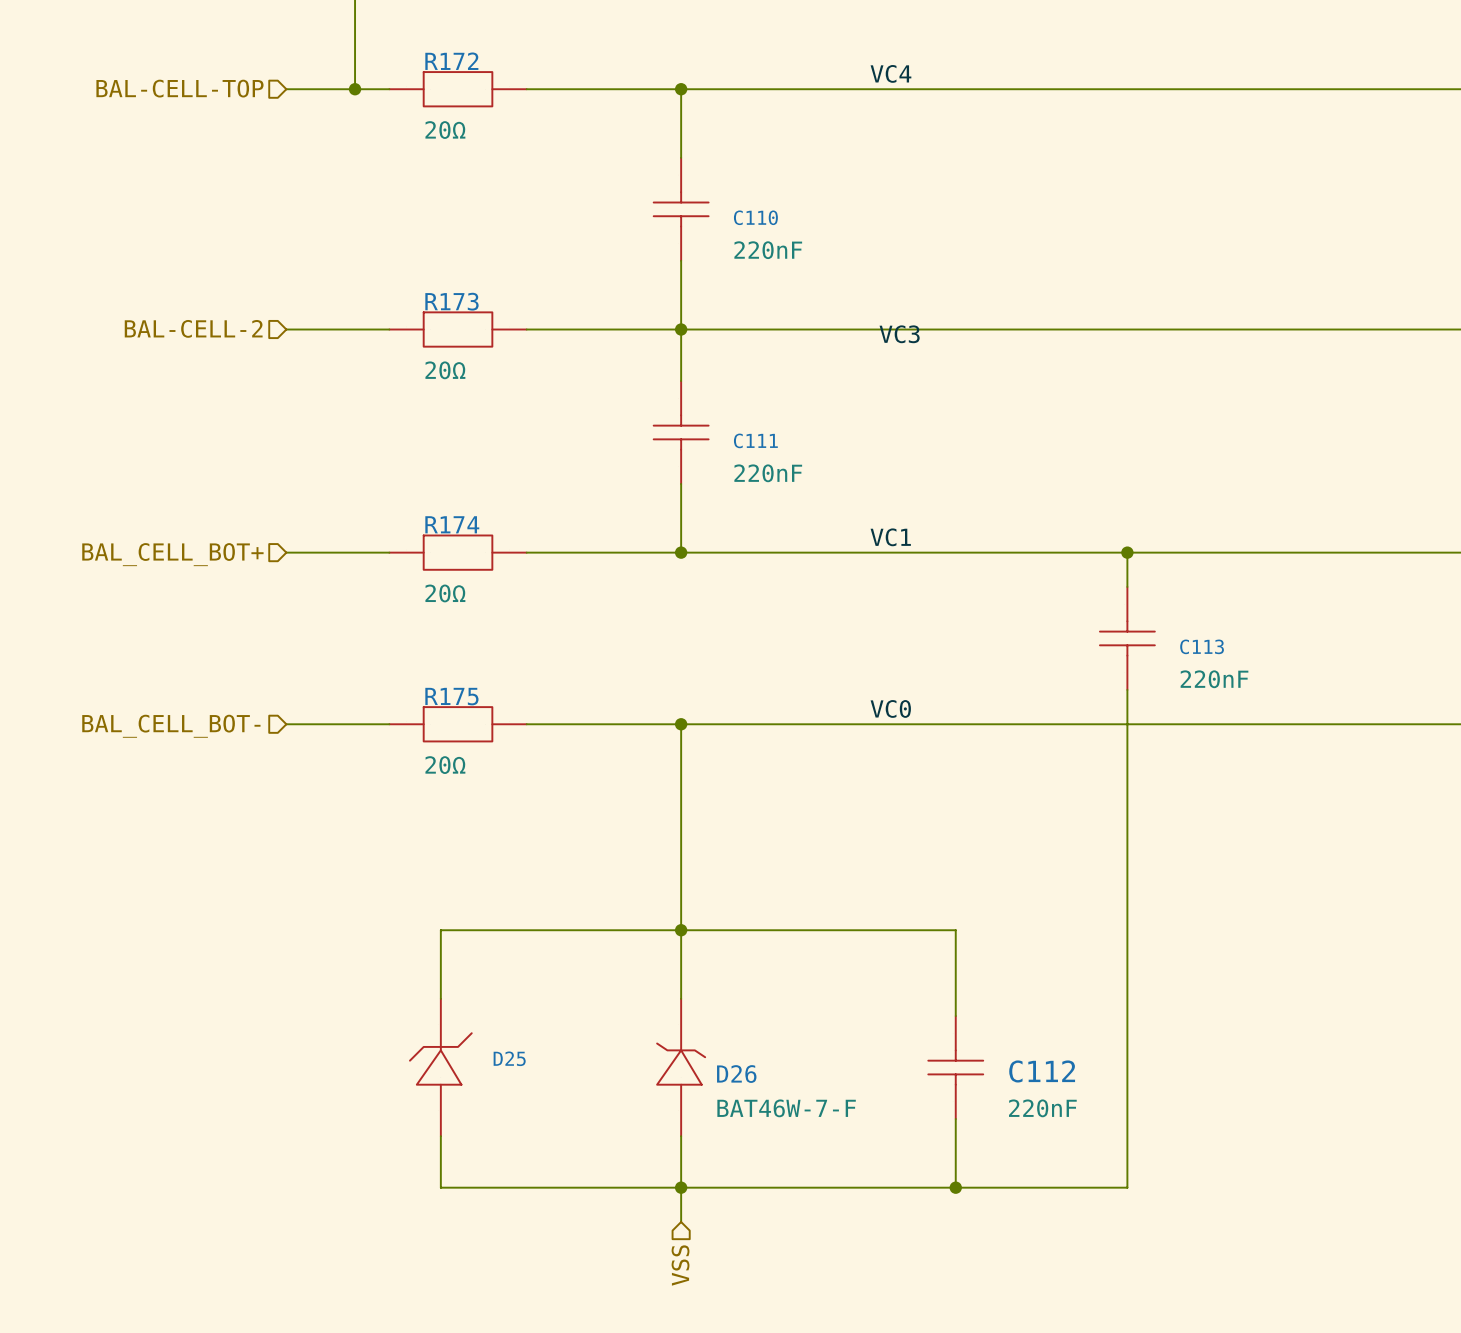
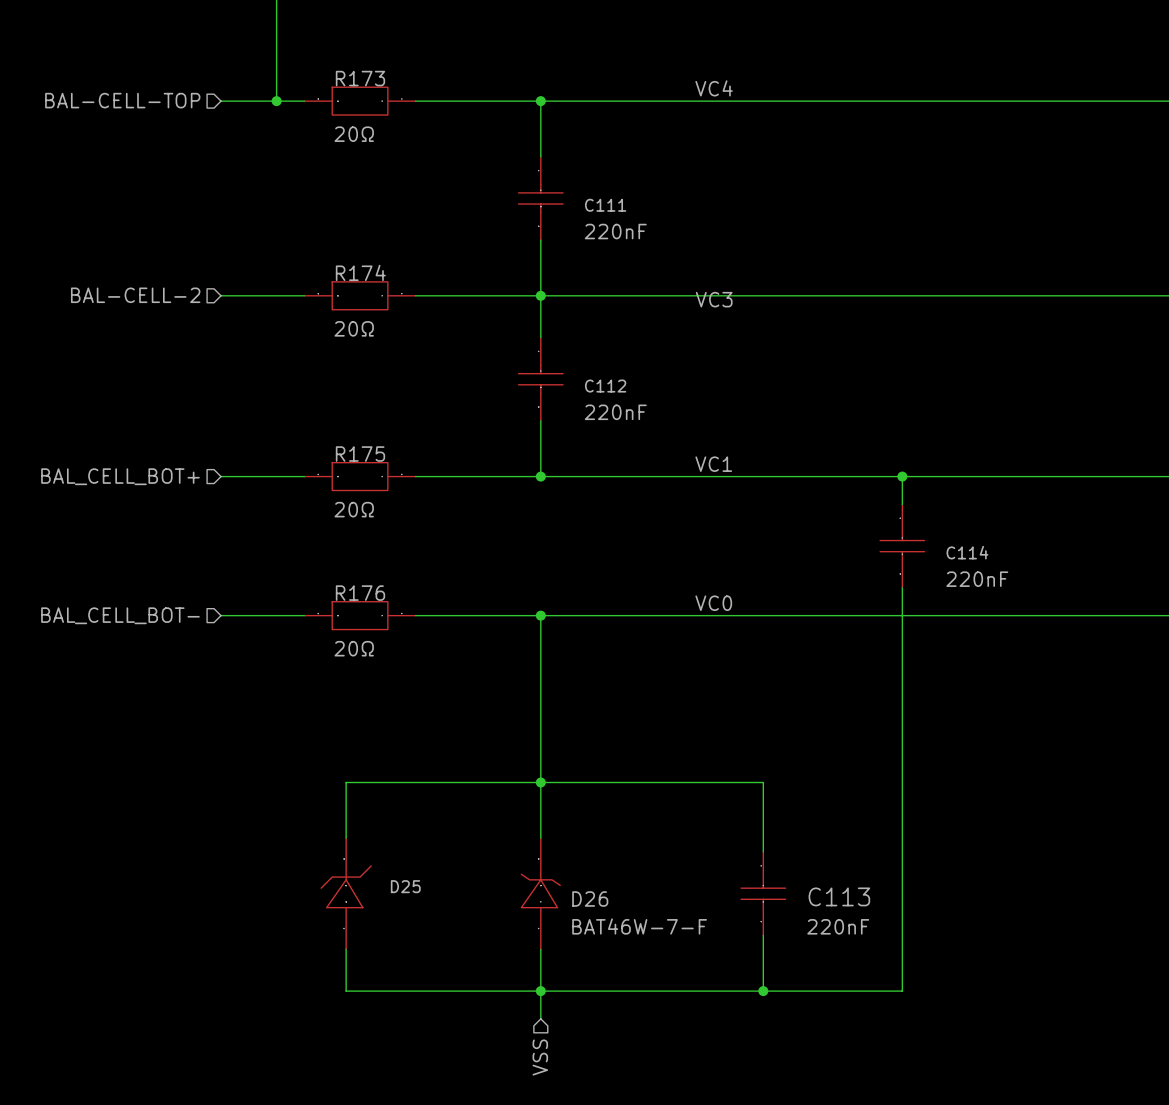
R172 name: R172 (451, 61) -> R173 (360, 78)
C110 name: C110 (755, 217) -> C111 (605, 205)
R173 name: R173 (451, 301) -> R174 (360, 272)
C111 name: C111 (755, 440) -> C112 (605, 386)
R174 name: R174 (452, 524) -> R175 (360, 454)
C113 name: C113 (1202, 646) -> C114 (967, 552)
R175 name: R175 (451, 696) -> R176 (360, 593)
C112 name: C112 (1042, 1071) -> C113 (839, 896)

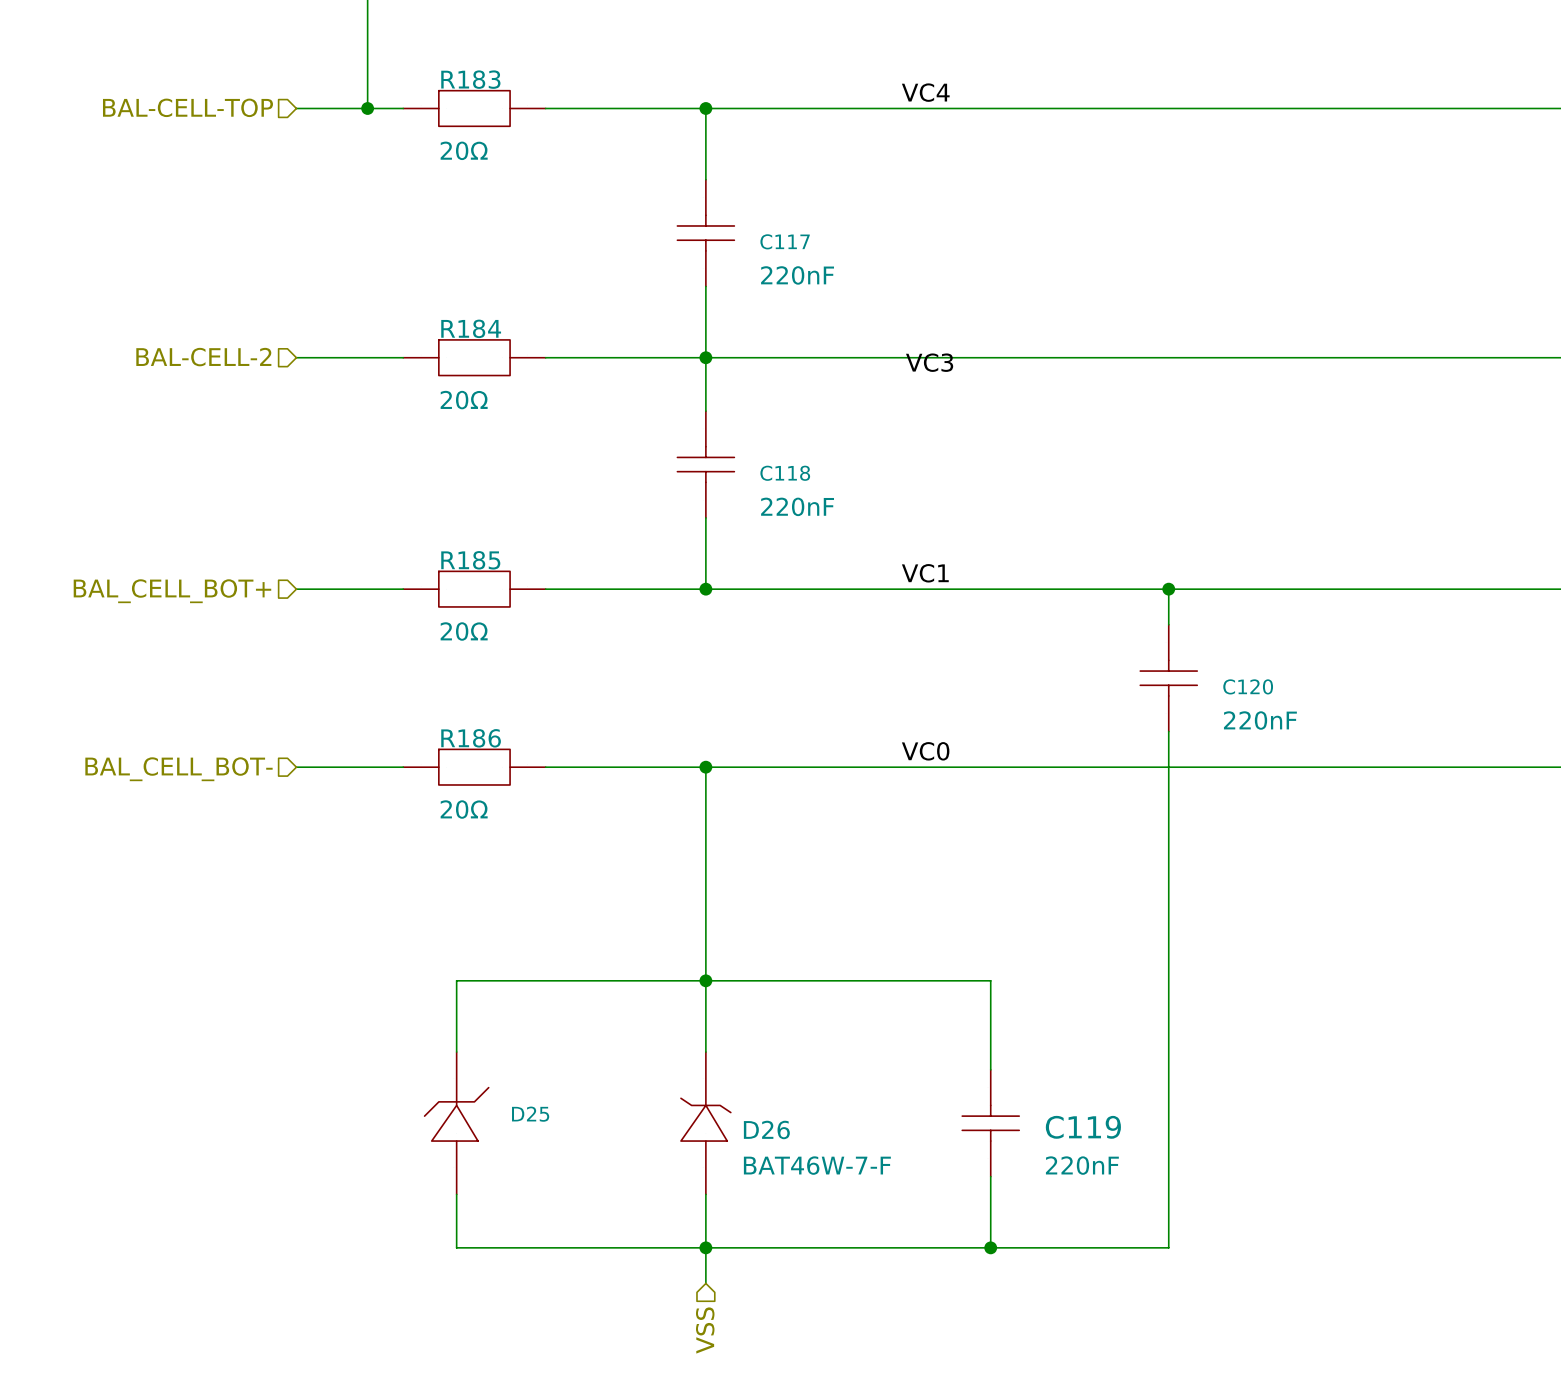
R173 name: R173 (360, 78) -> R183 (470, 79)
C111 name: C111 (605, 205) -> C117 (785, 241)
R174 name: R174 (360, 272) -> R184 (471, 328)
C112 name: C112 (605, 386) -> C118 (785, 473)
R175 name: R175 (360, 454) -> R185 (470, 560)
C114 name: C114 (967, 552) -> C120 (1248, 686)
R176 name: R176 (360, 593) -> R186 (471, 738)
C113 name: C113 (839, 896) -> C119 (1083, 1127)

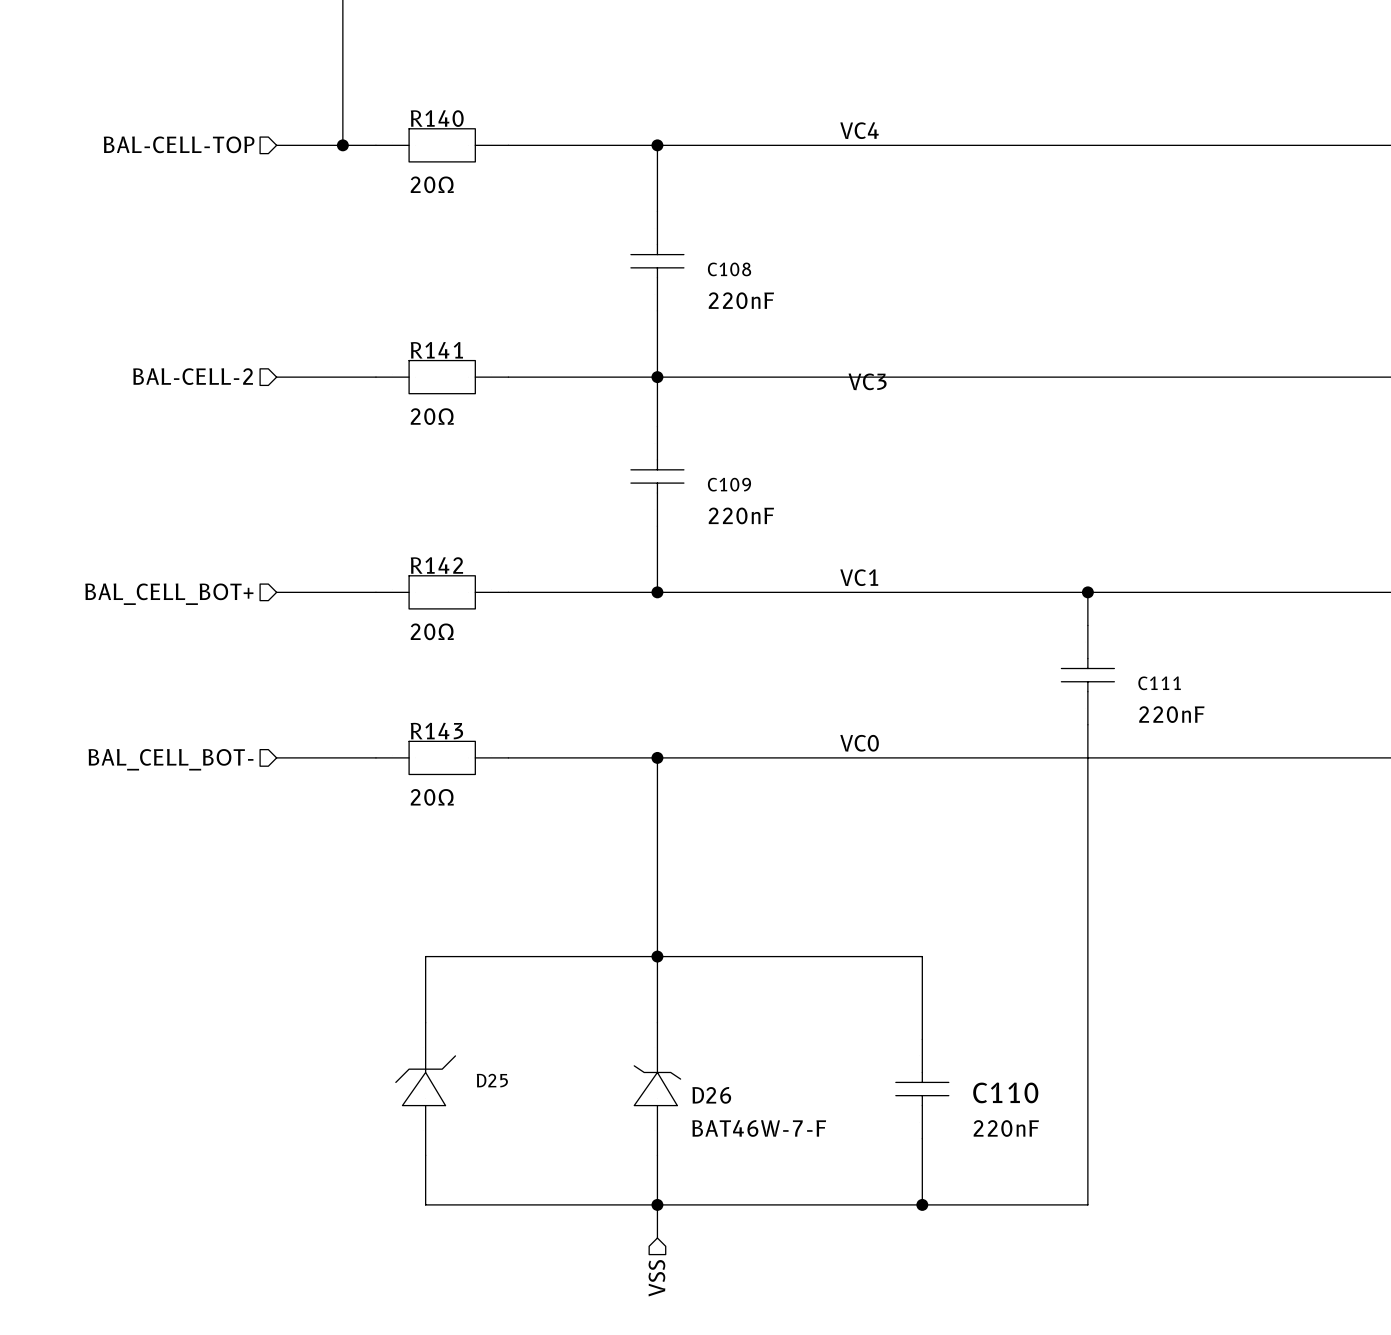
R183 name: R183 (470, 79) -> R140 (437, 118)
C117 name: C117 (785, 241) -> C108 (729, 269)
R184 name: R184 (471, 328) -> R141 (436, 350)
C118 name: C118 (785, 473) -> C109 (729, 484)
R185 name: R185 (470, 560) -> R142 (436, 565)
C120 name: C120 (1248, 686) -> C111 (1159, 683)
R186 name: R186 (471, 738) -> R143 (436, 731)
C119 name: C119 (1083, 1127) -> C110 (1005, 1092)

